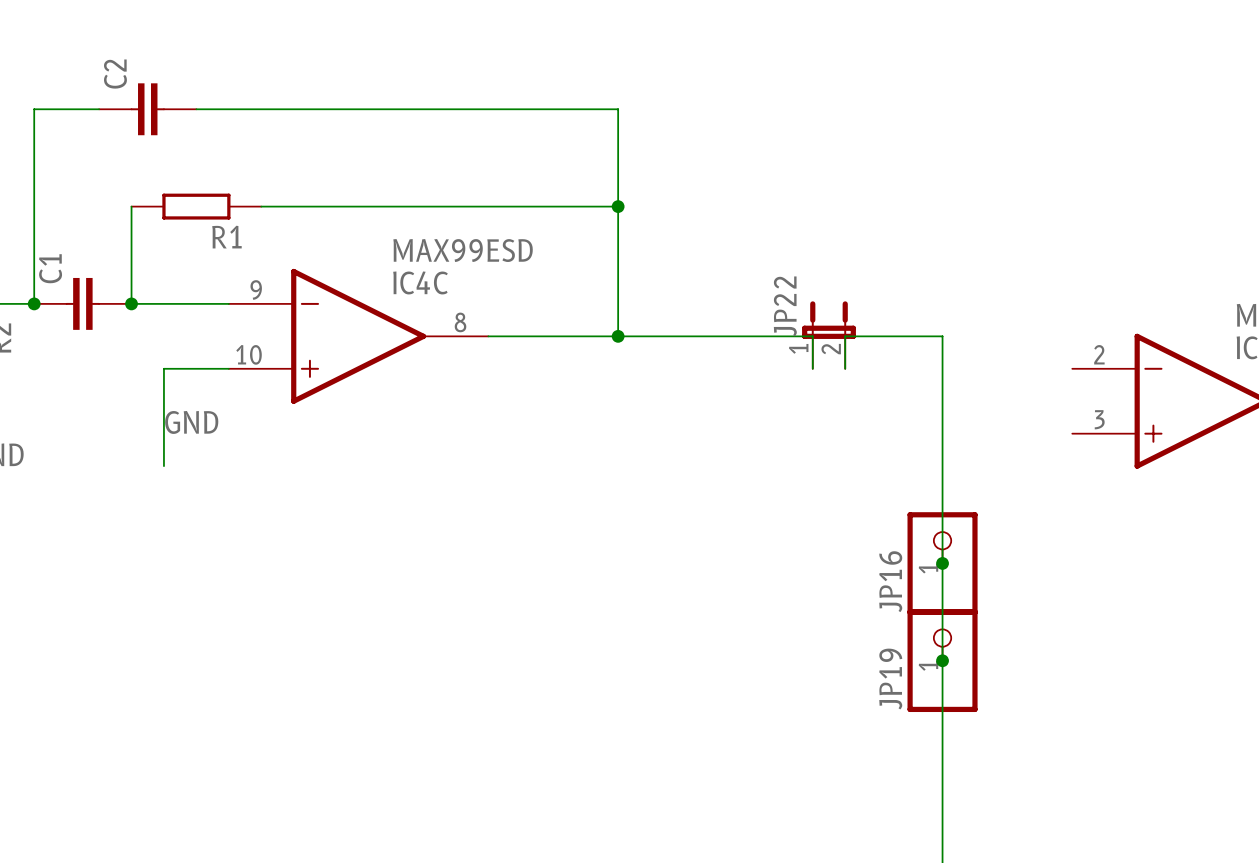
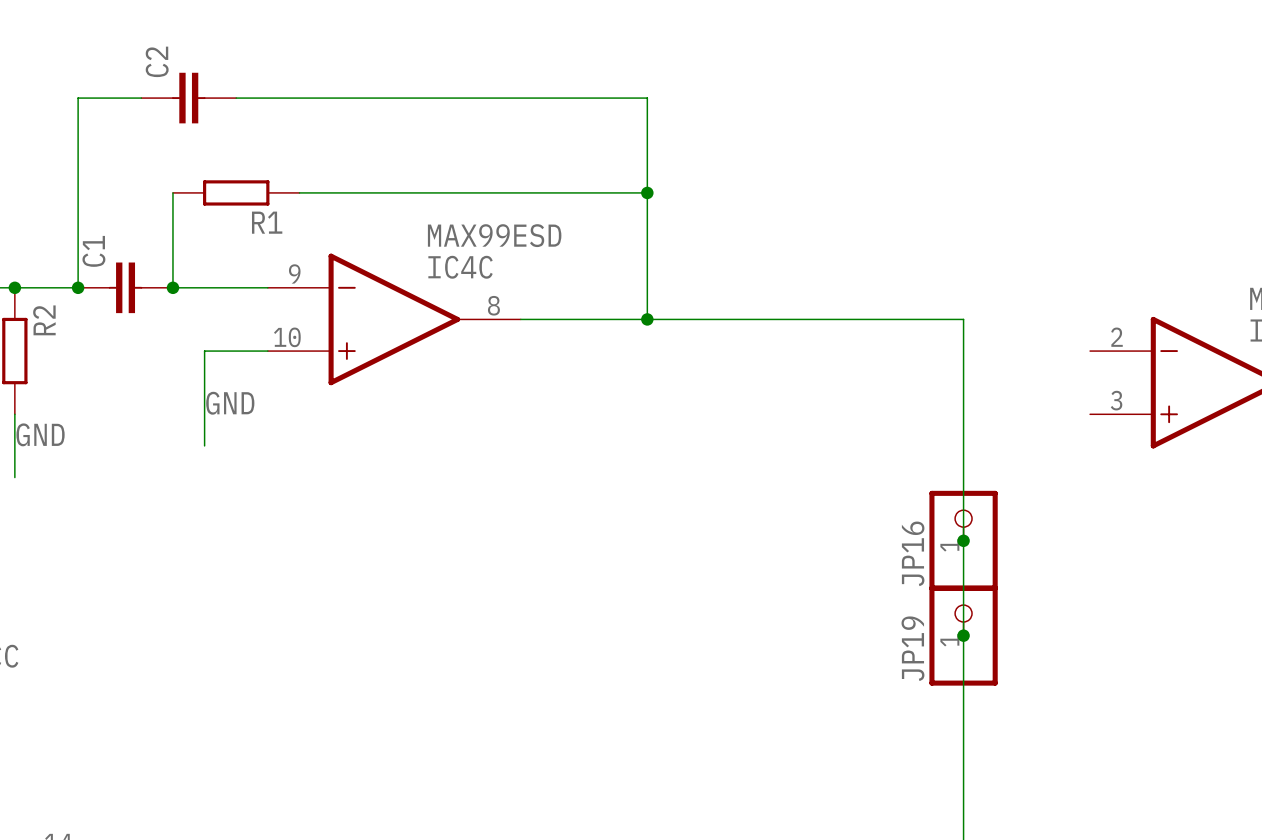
JP22: (828, 335) -> none
wire: (845, 336) (845, 368) -> none

